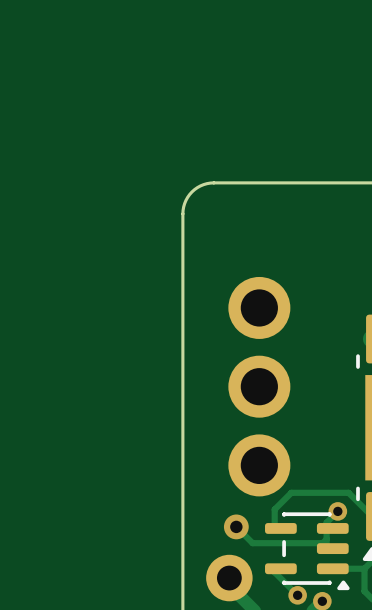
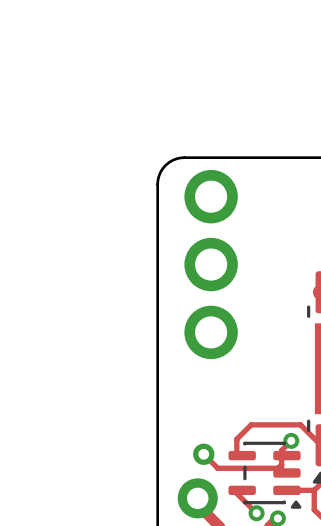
part position: (259, 386) -> (211, 264)

